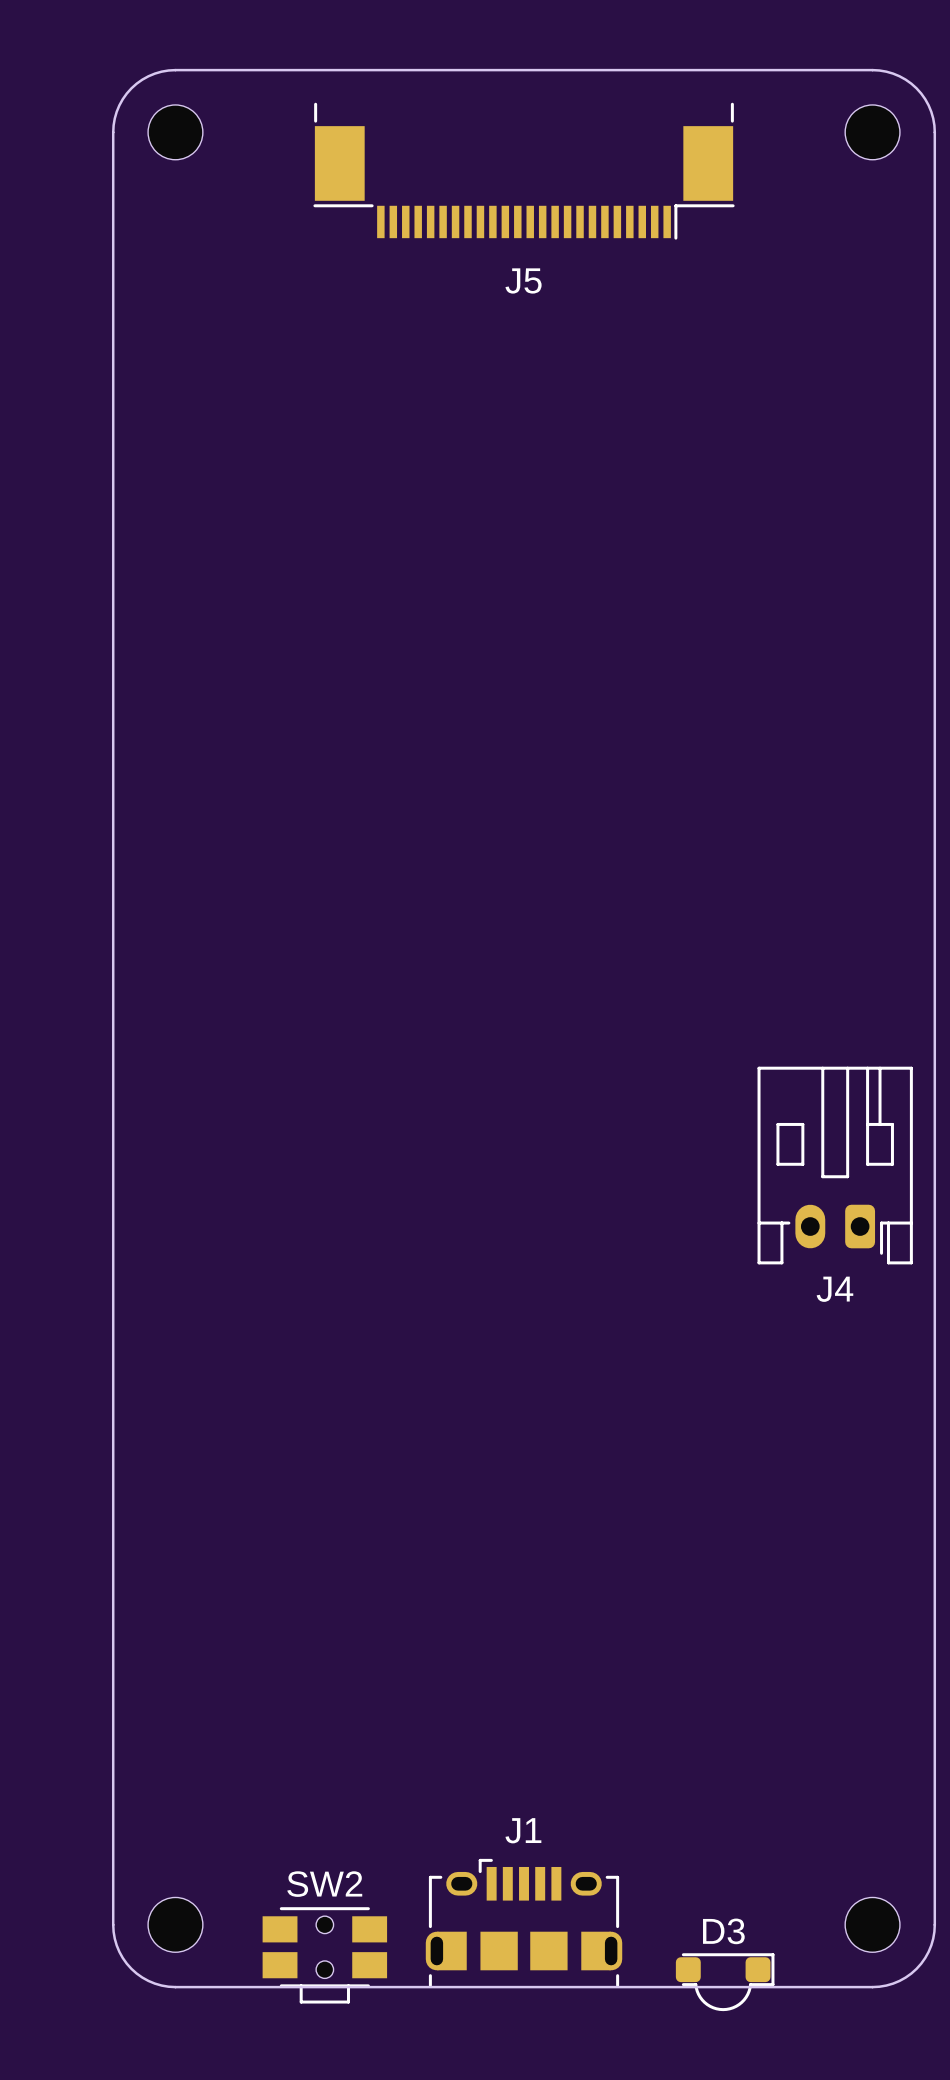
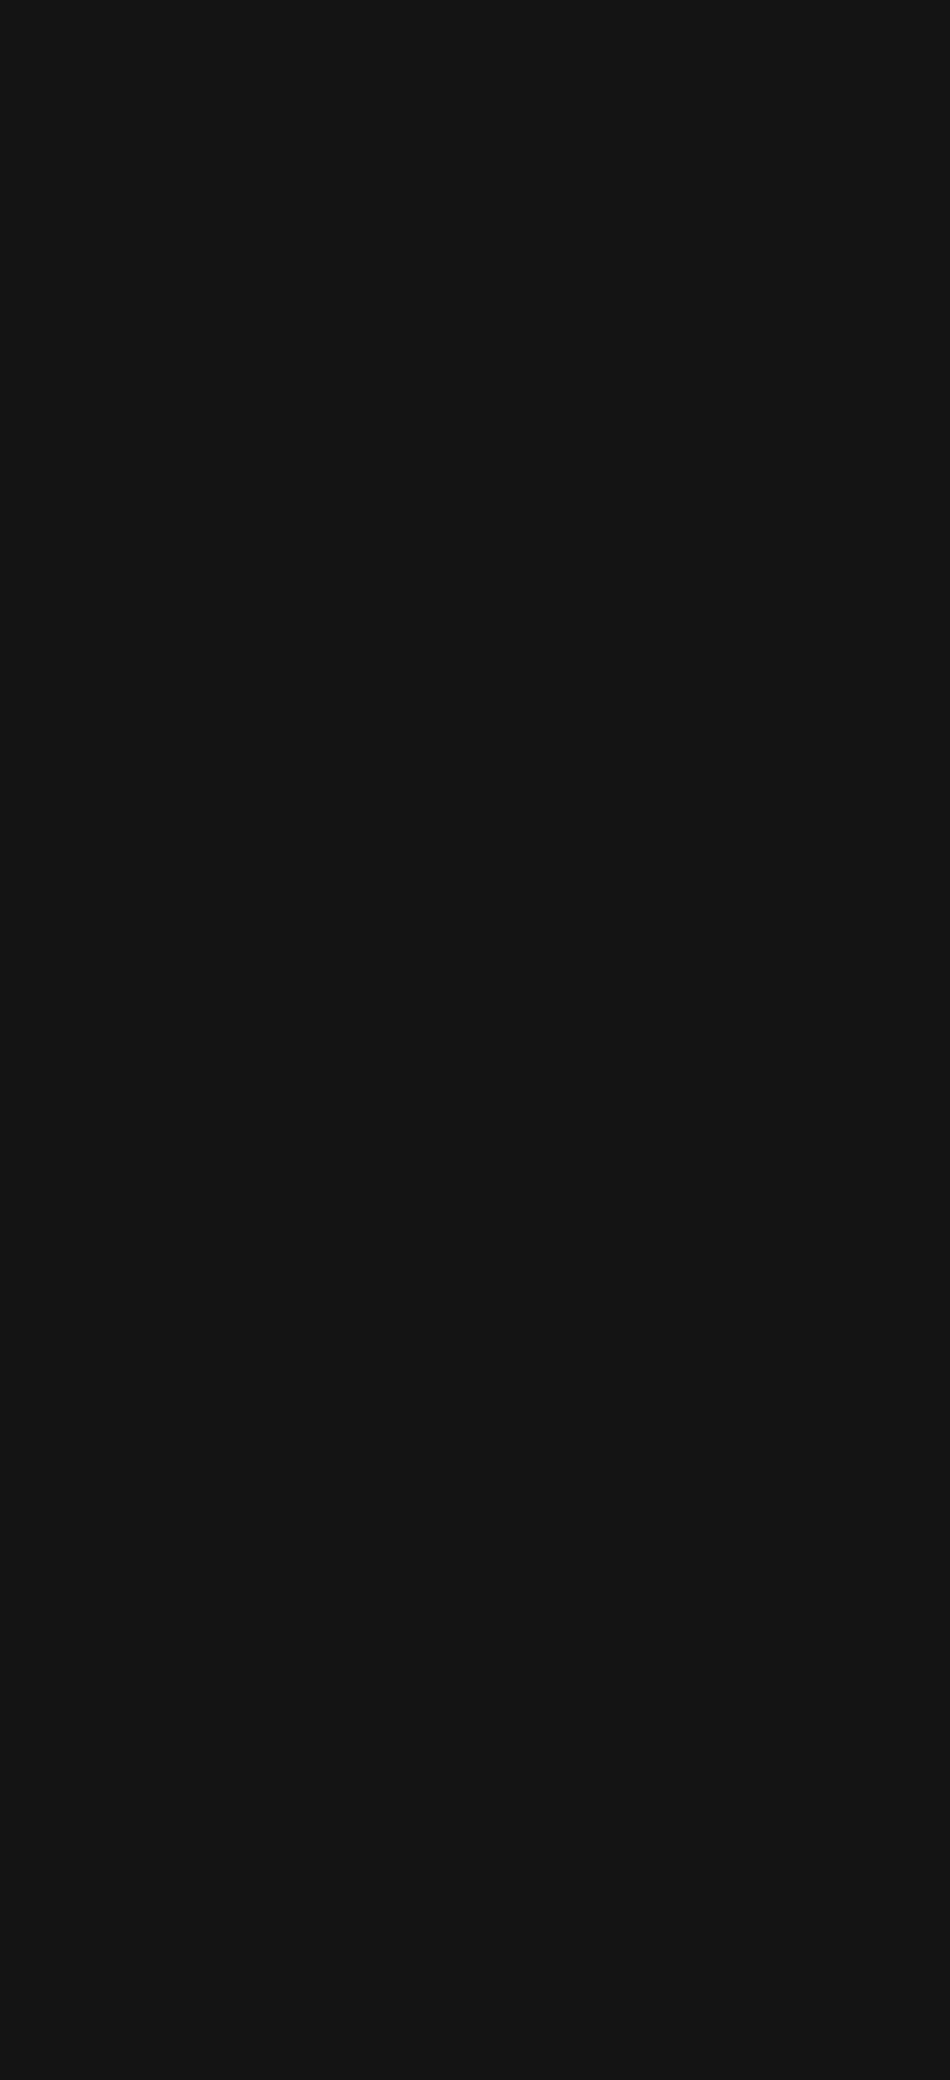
board edge: (175, 70) (872, 70) (893, 73) (911, 83) (921, 93) (931, 111) (934, 132) (934, 1924) (931, 1945) (925, 1957) (911, 1973) (893, 1983) (872, 1987) (175, 1987) (154, 1983) (136, 1973) (126, 1963) (116, 1945) (113, 1924) (113, 132) (114, 118) (119, 105) (131, 88) (148, 76) (161, 71) (175, 70) -> none
part: (175, 132) -> none
part: (872, 132) -> none
J5: (524, 171) -> none
J4: (835, 1165) -> none
J1: (524, 1922) -> none
part: (175, 1924) -> none
part: (872, 1924) -> none
SW2: (324, 1955) -> none
D3: (725, 1982) -> none

